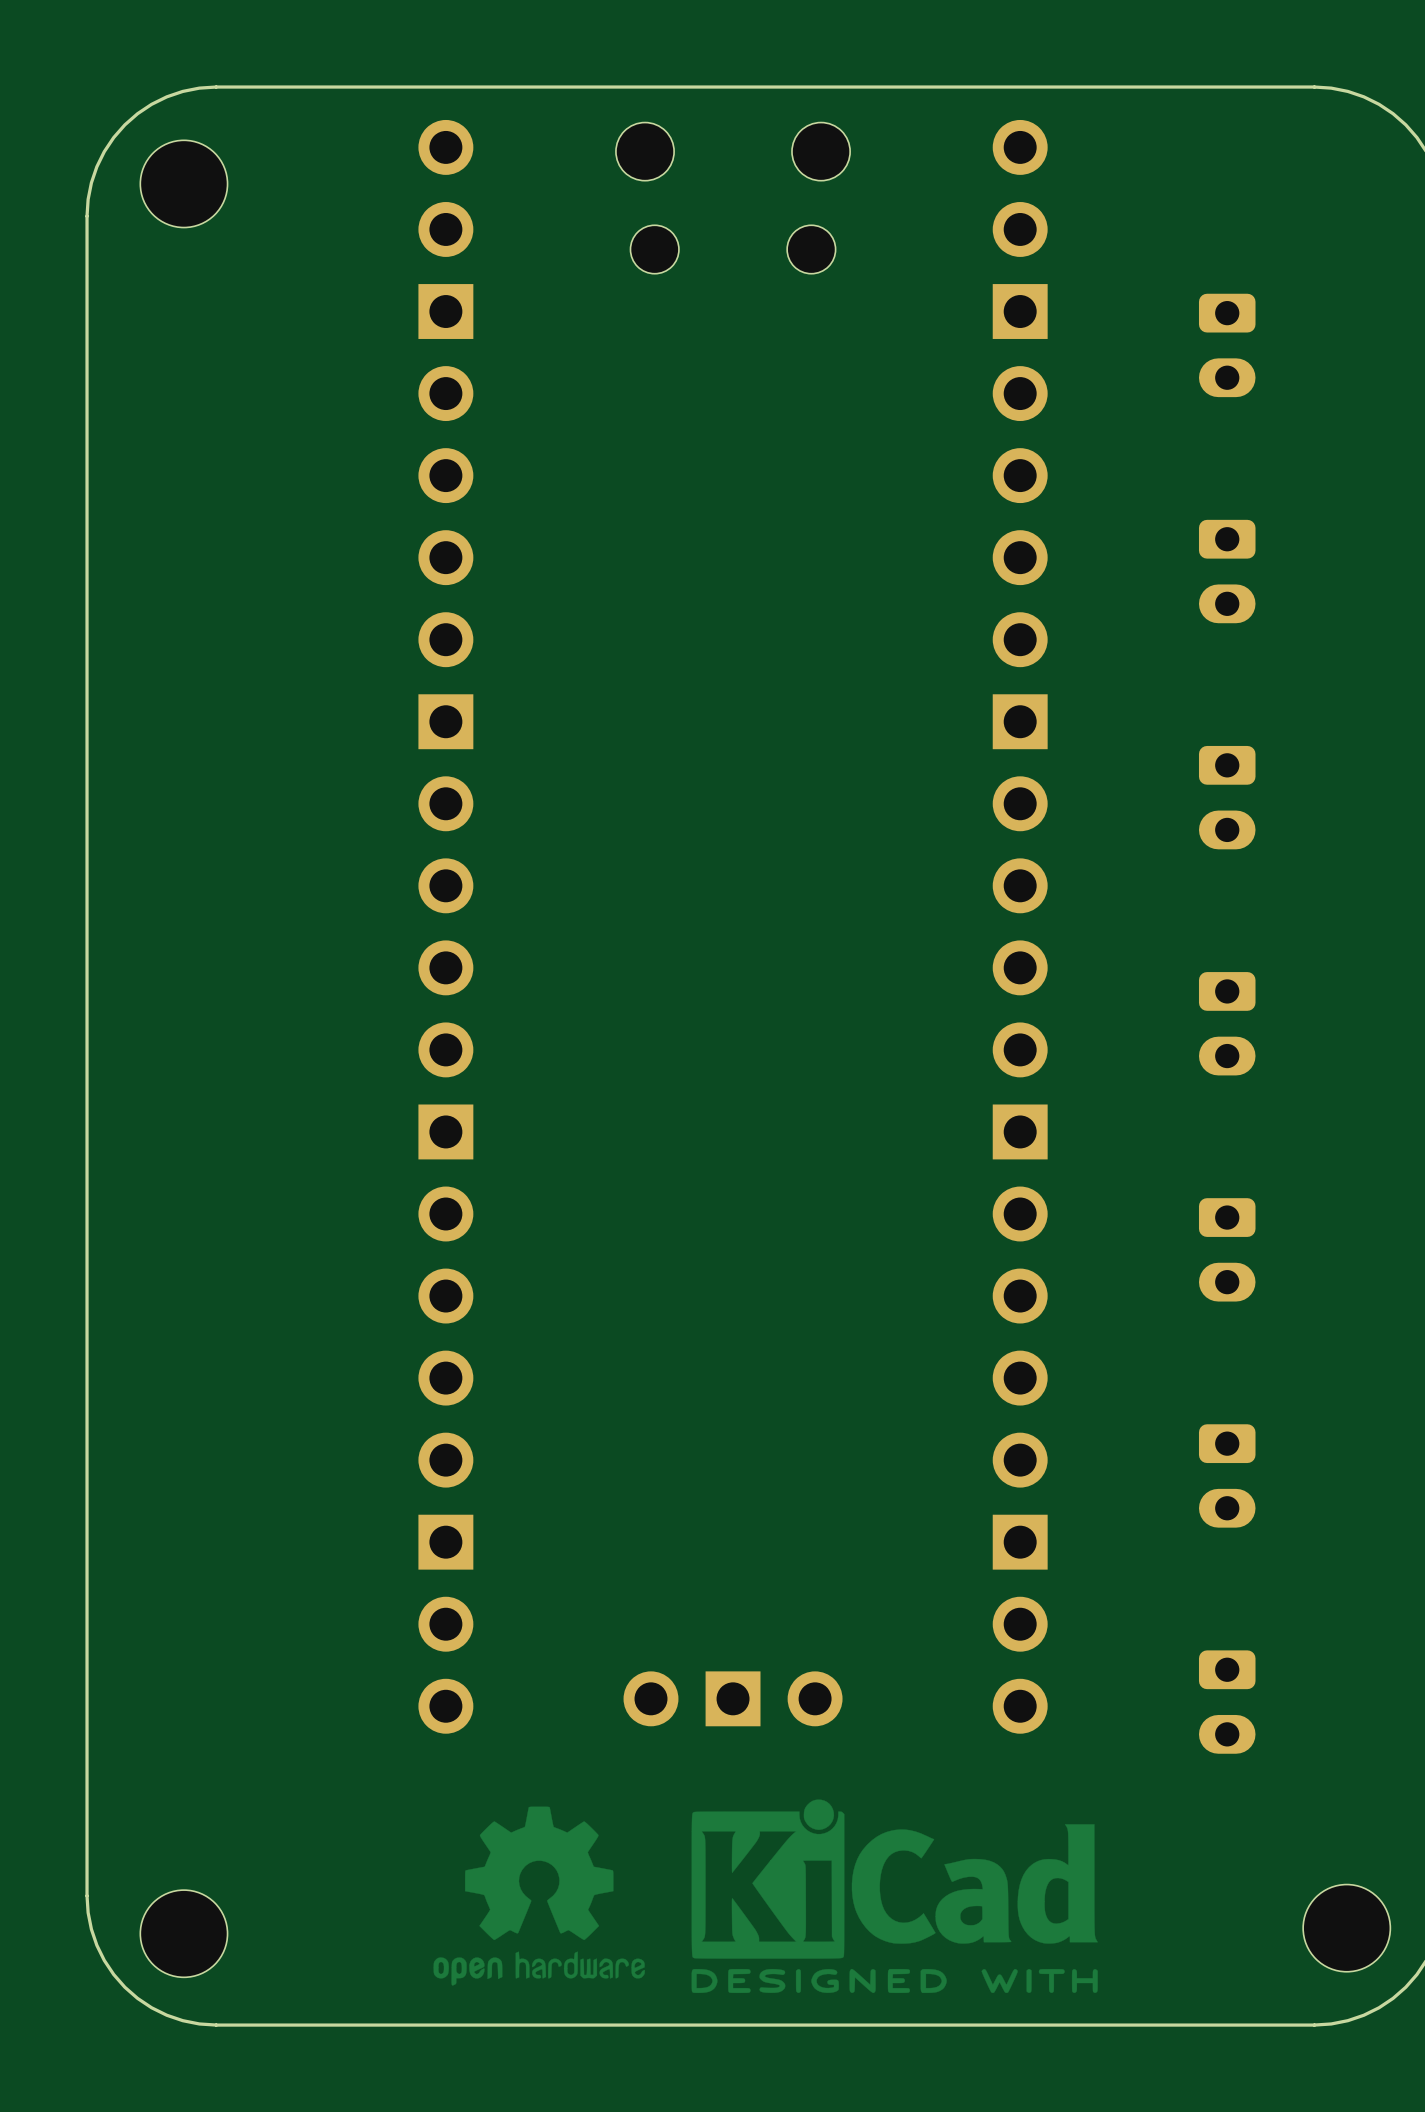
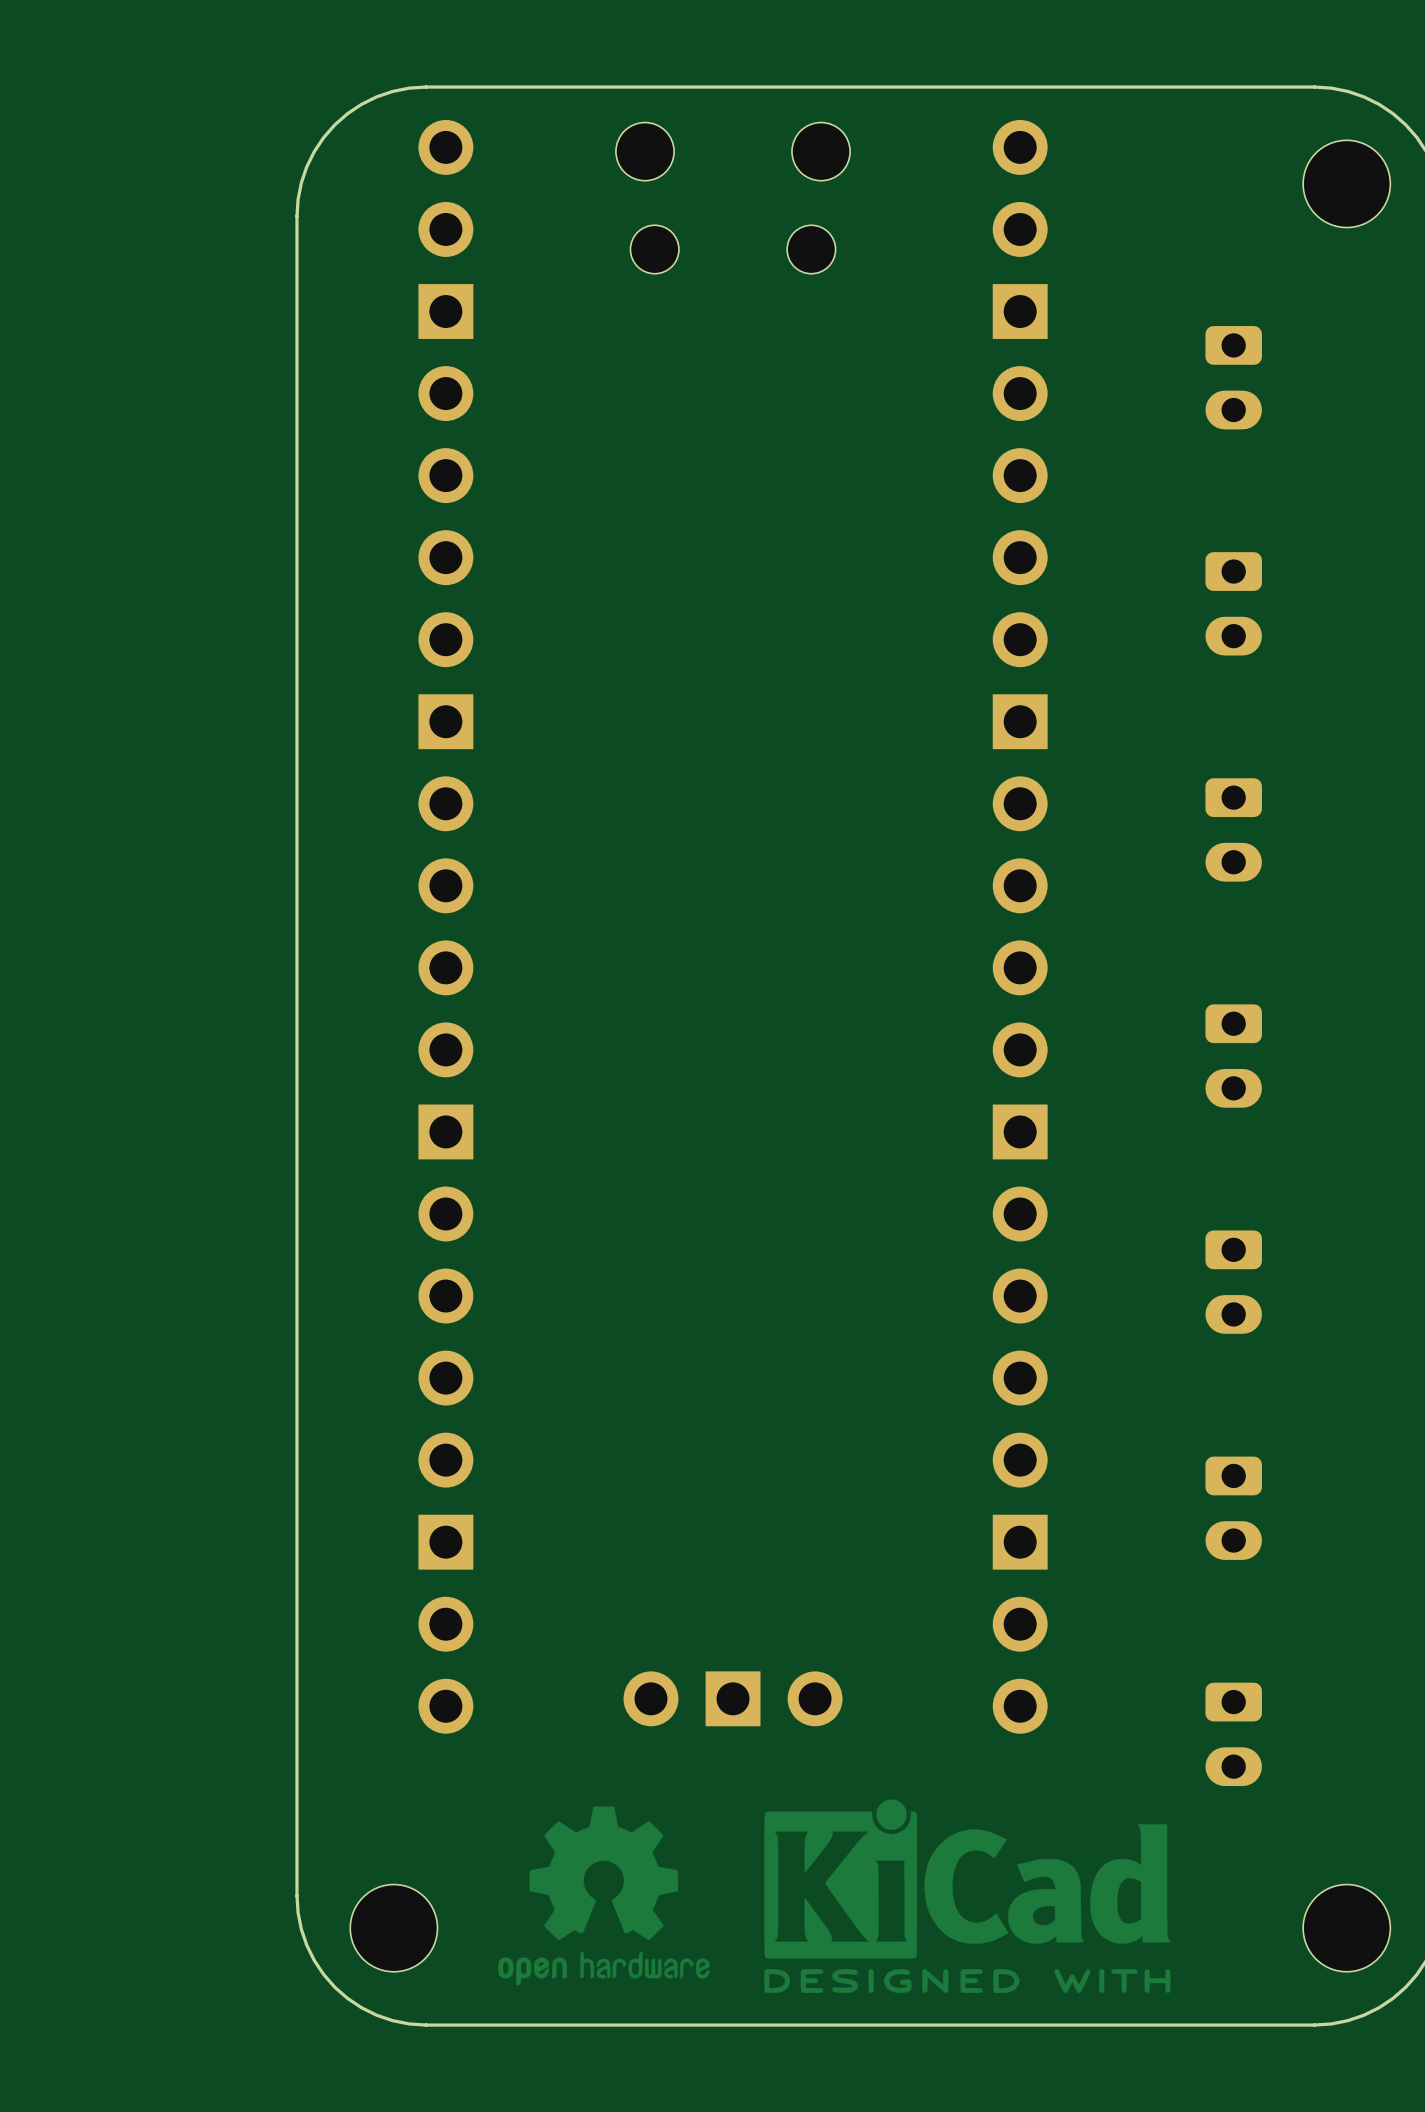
board edge: (426, 87) (216, 87) (182, 91) (166, 96) (137, 113) (113, 137) (96, 166) (91, 182) (87, 216) (88, 1912) (91, 1929) (104, 1960) (124, 1987) (151, 2007) (182, 2020) (216, 2025) (426, 2025) -> (426, 87) (392, 91) (376, 96) (347, 113) (334, 124) (323, 137) (306, 166) (301, 182) (296, 216) (298, 1912) (306, 1945) (323, 1974) (334, 1987) (347, 1998) (376, 2015) (392, 2020) (426, 2025)
part: (183, 183) -> none
part: none -> (1346, 183)
part position: (1227, 345) -> (1233, 377)
part position: (1227, 571) -> (1233, 603)
part position: (1227, 797) -> (1233, 829)
part position: (1227, 1023) -> (1233, 1056)
part position: (1227, 1249) -> (1233, 1282)
part position: (1227, 1475) -> (1233, 1508)
part position: (1227, 1702) -> (1233, 1734)
drawing position: (539, 1896) -> (603, 1896)
drawing position: (894, 1896) -> (967, 1896)
part position: (183, 1933) -> (393, 1928)

